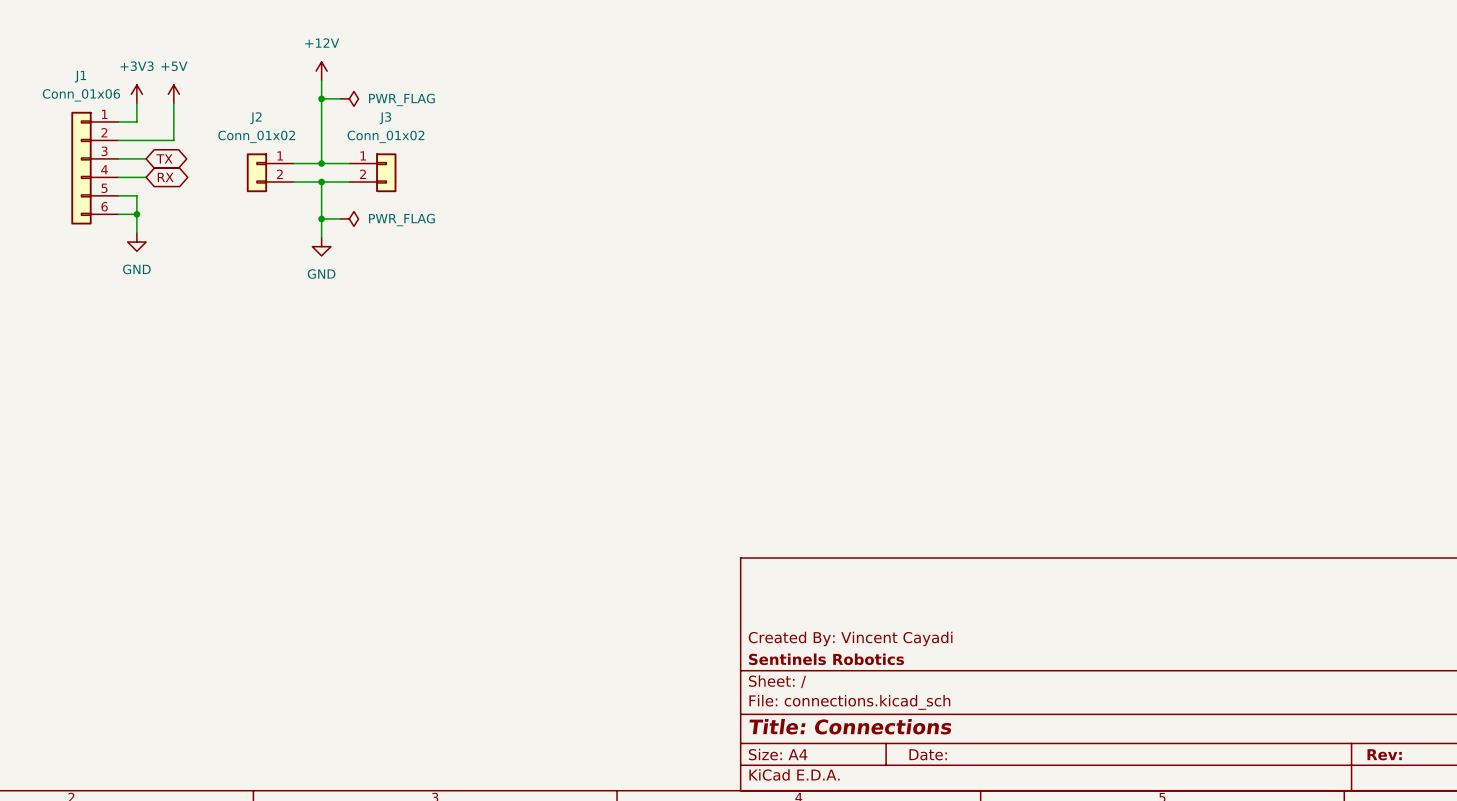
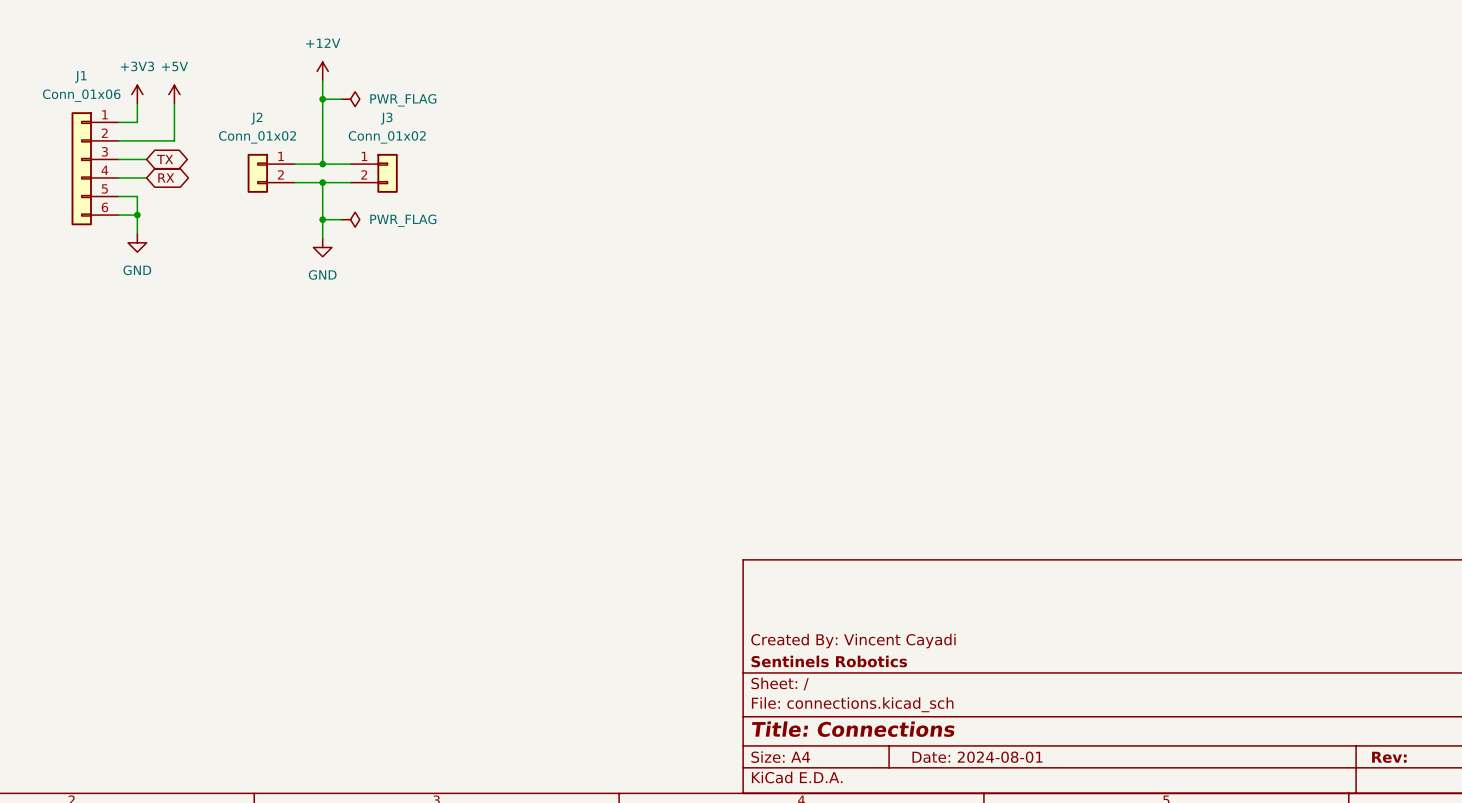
title block: Date: (928, 754) -> Date: 2024-08-01 (977, 757)

